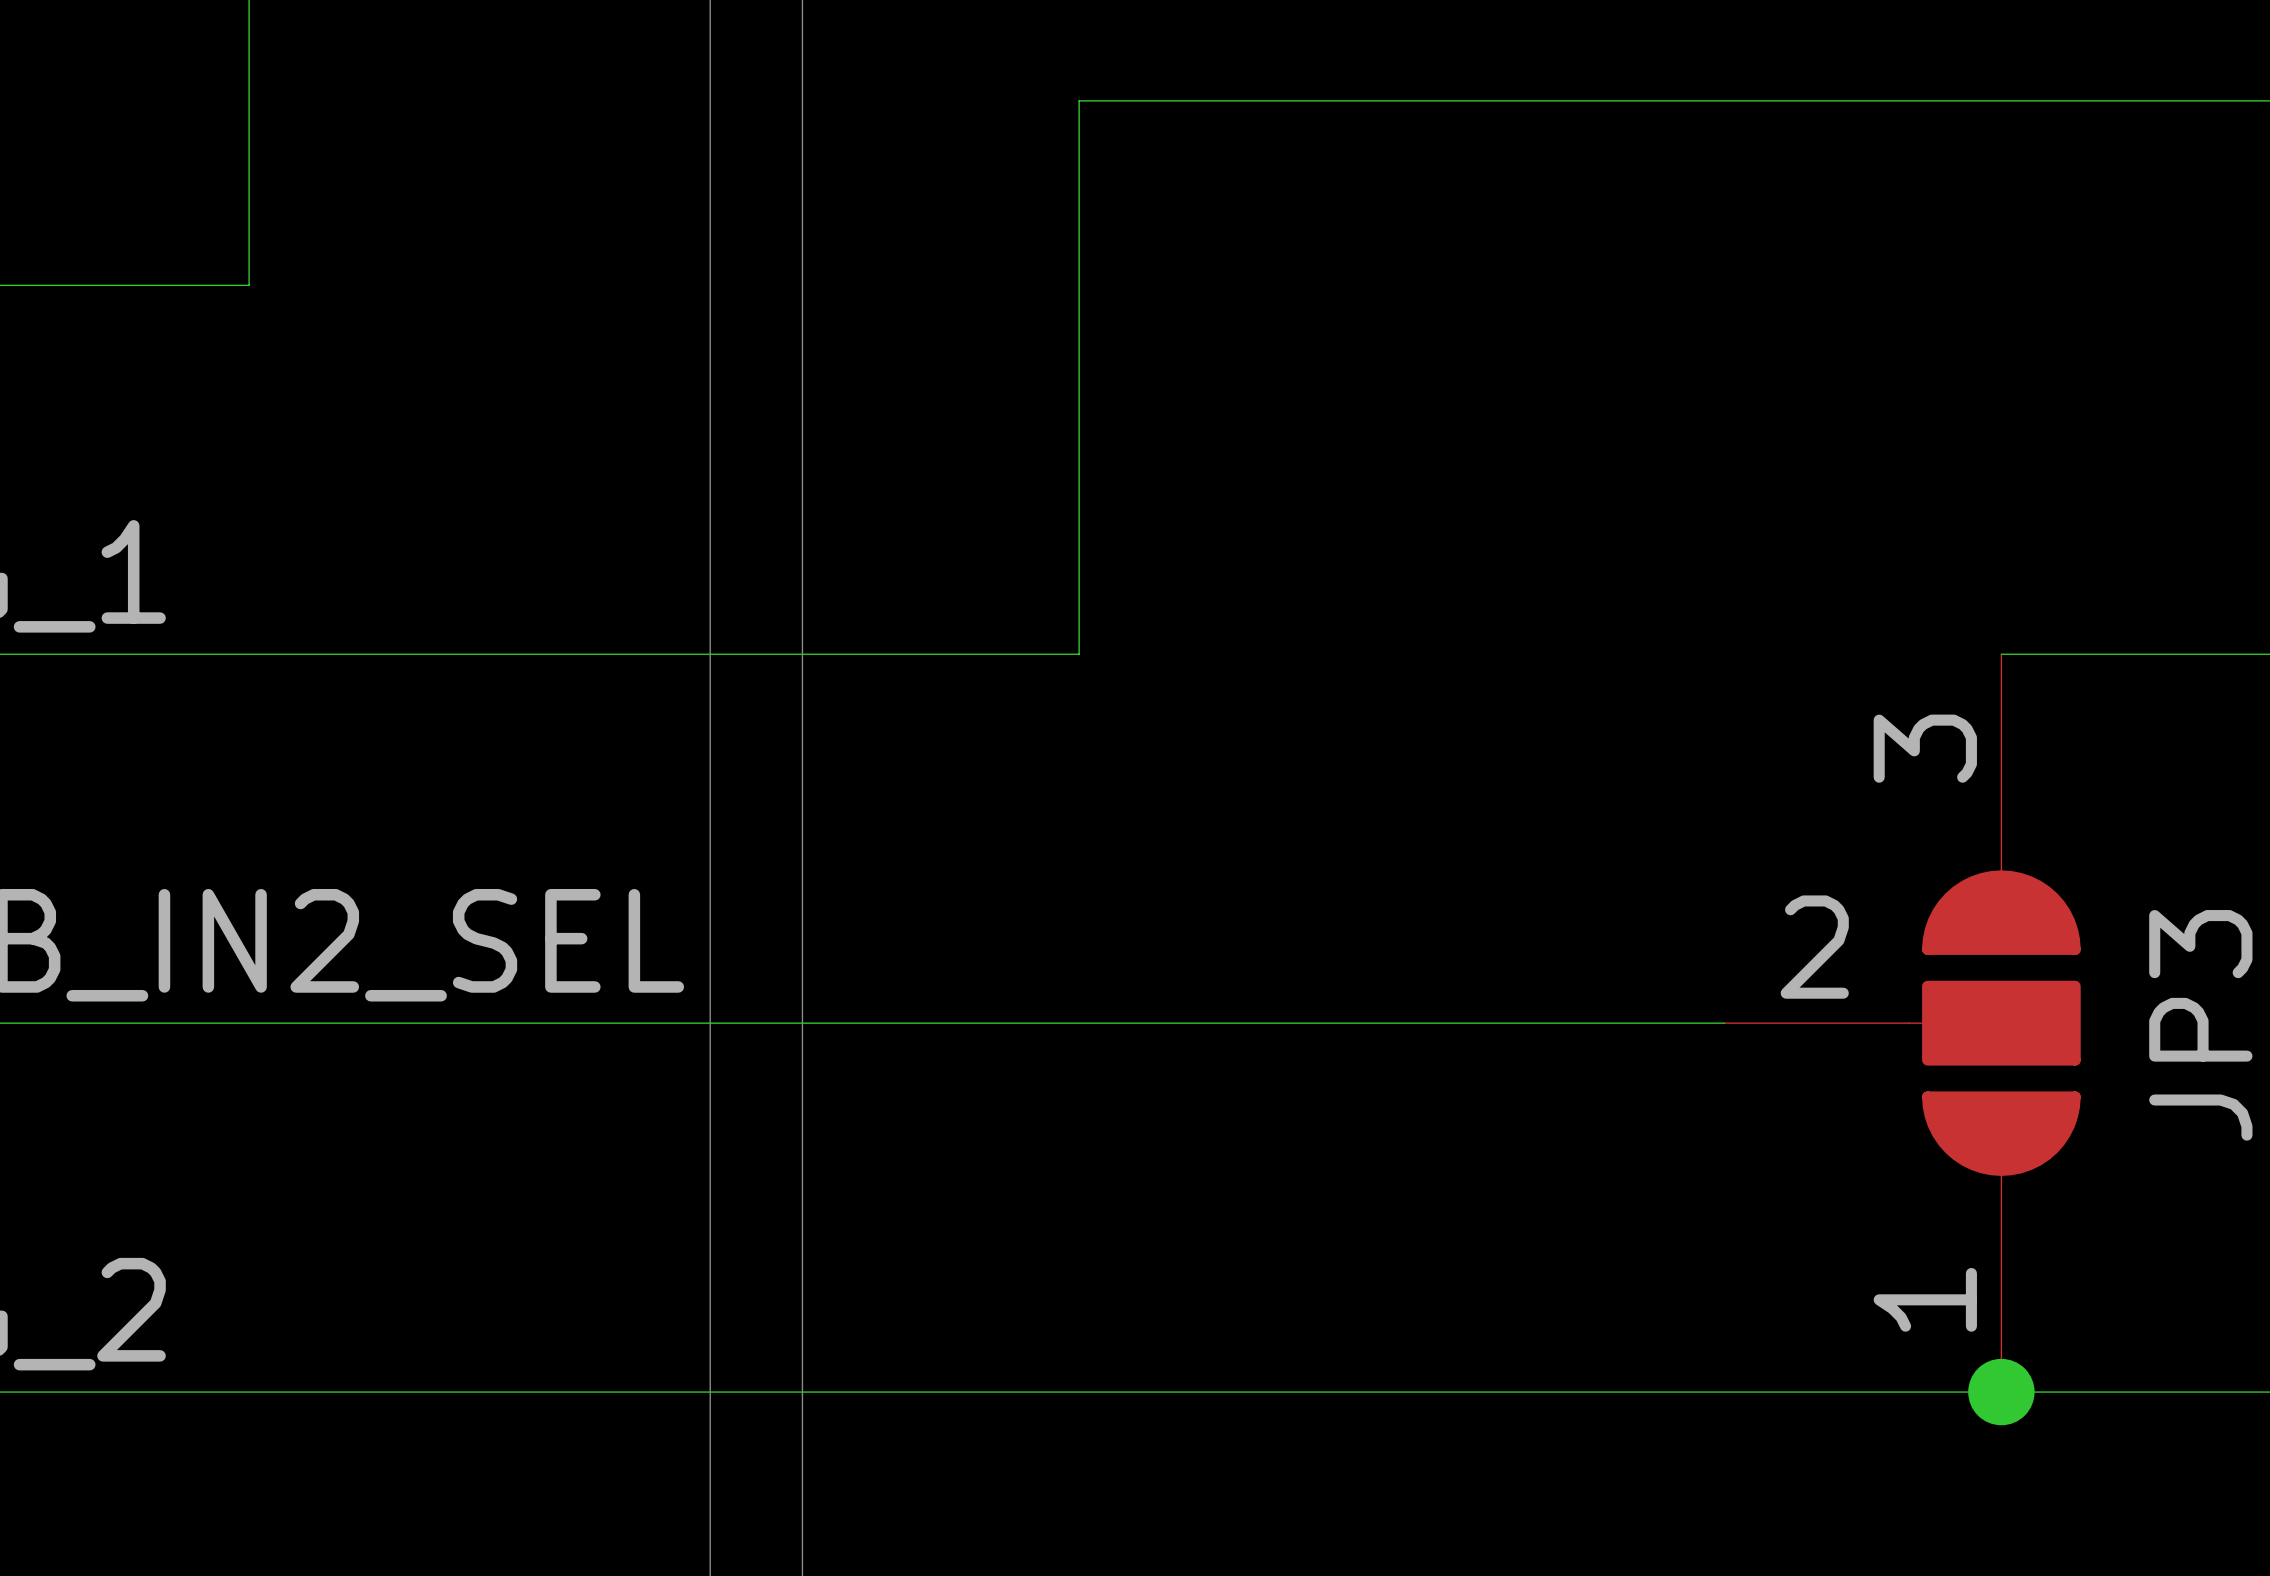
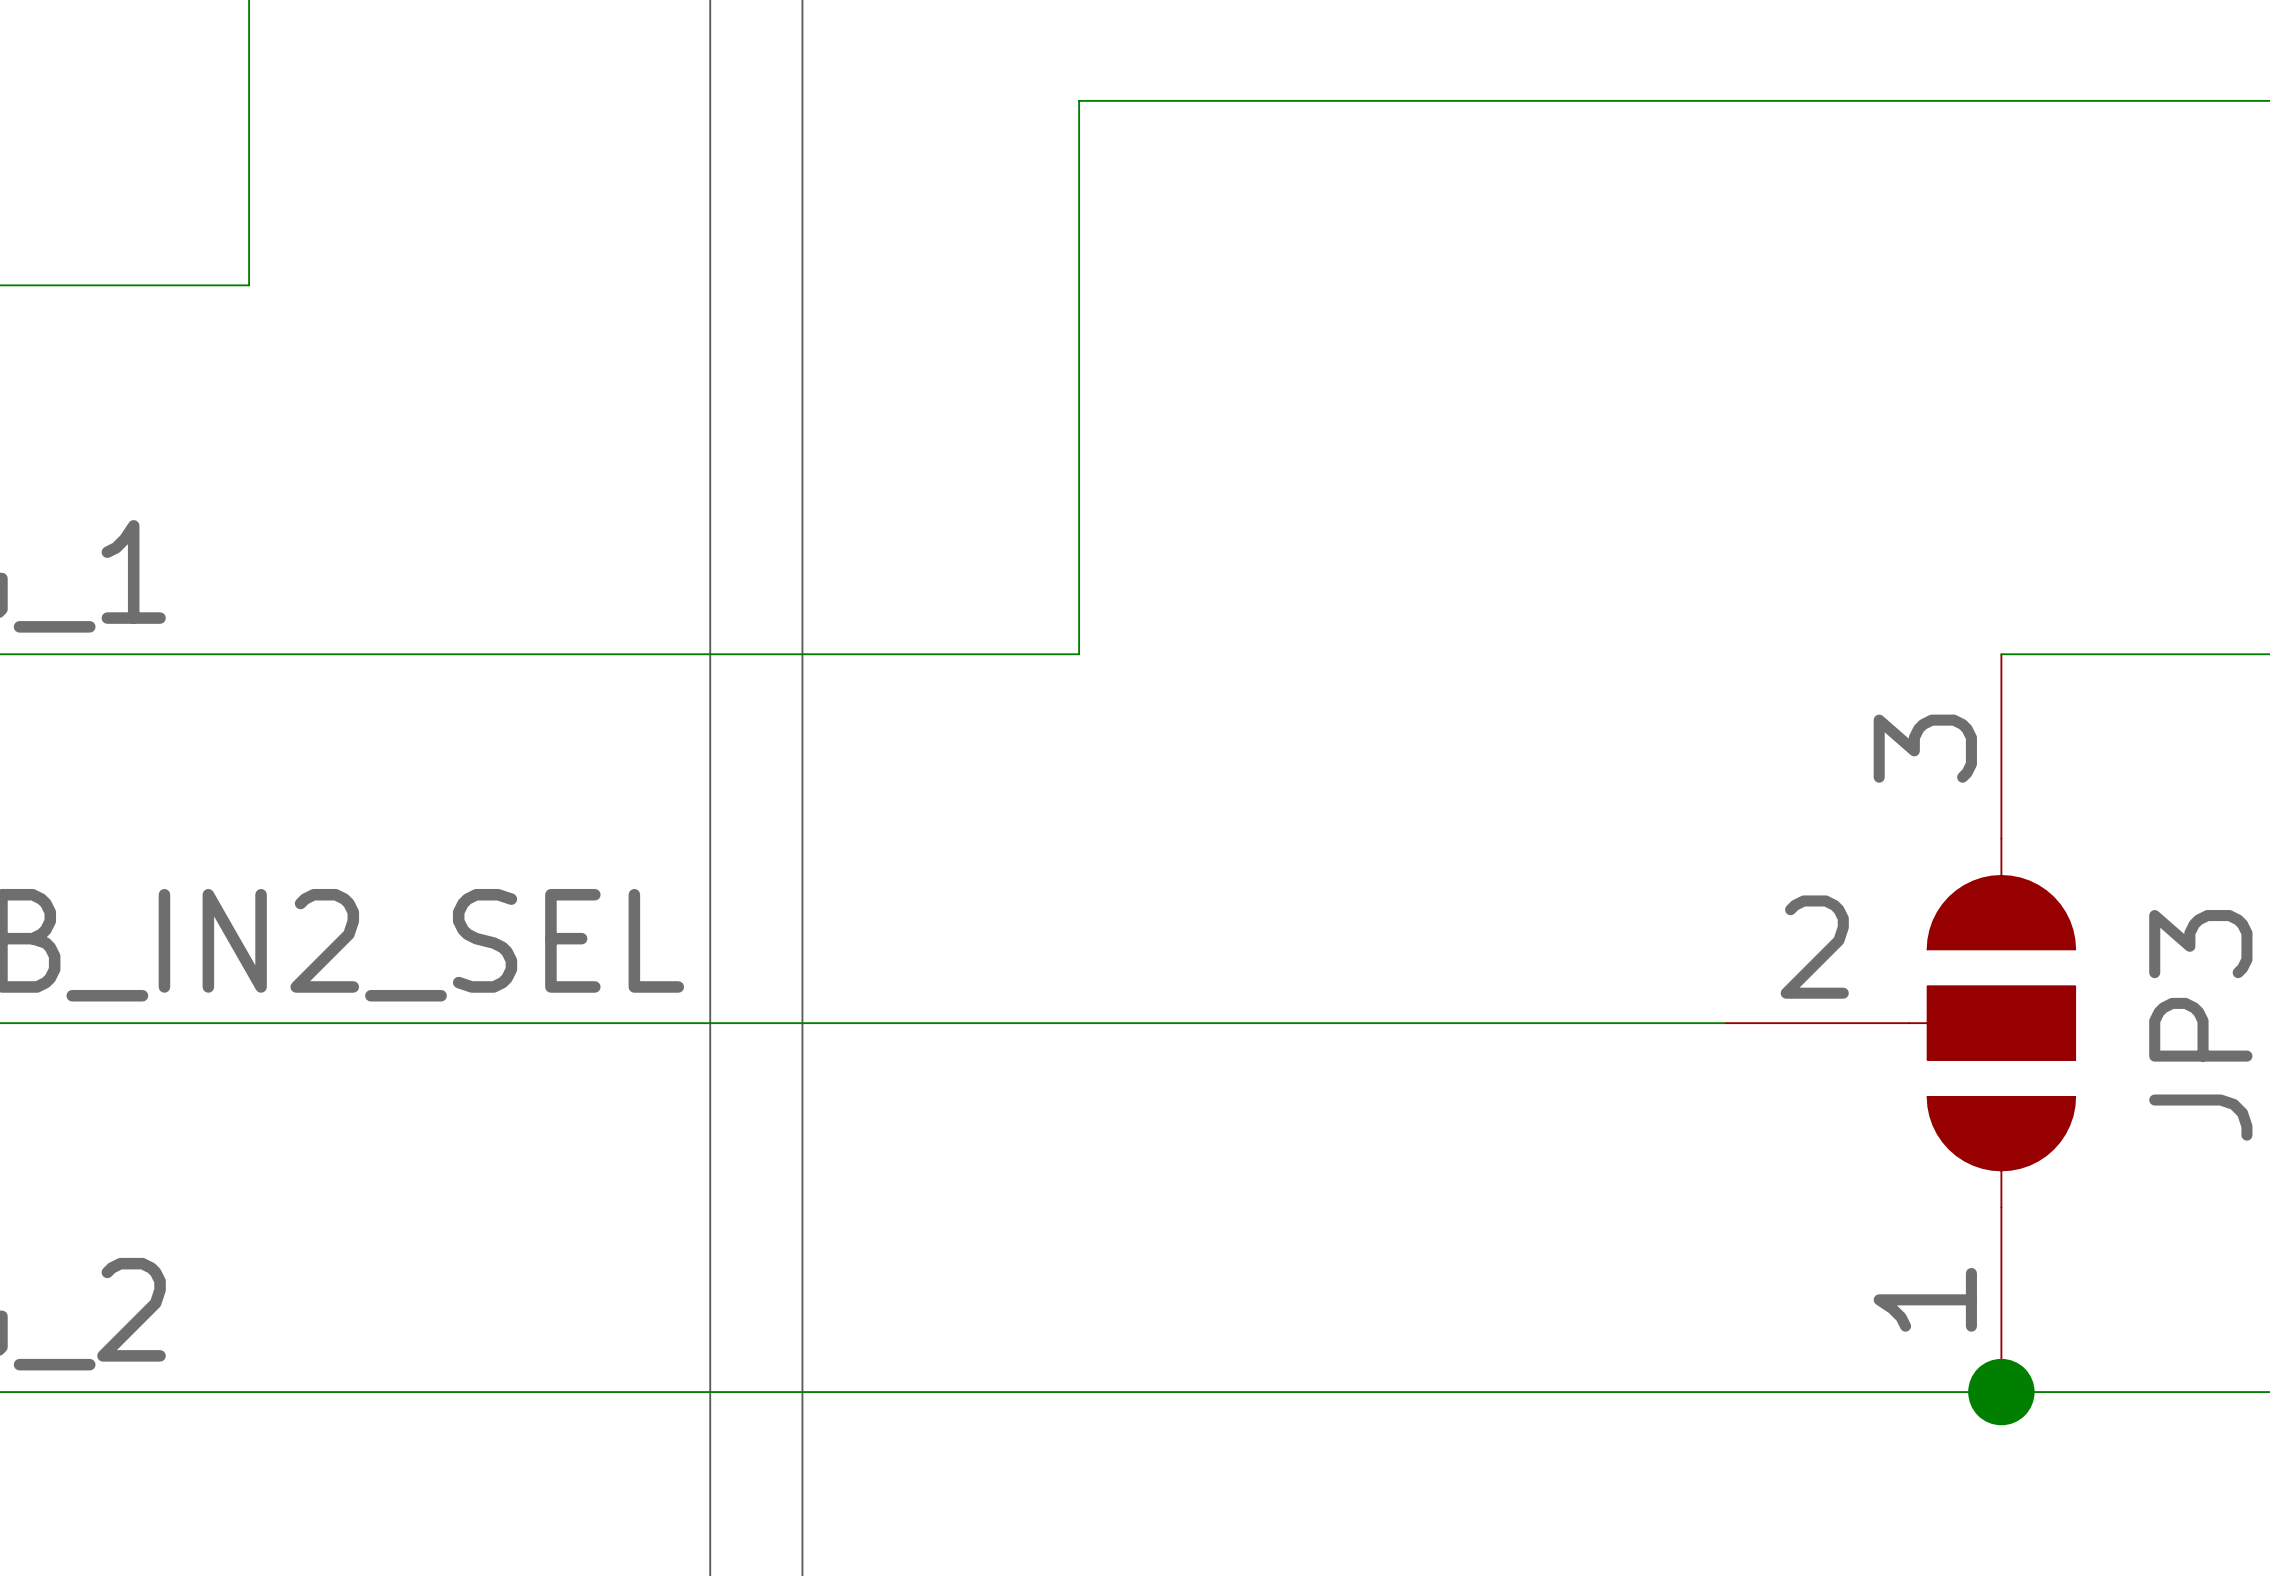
JP3 symbol: [1724, 654, 2081, 1393] -> [1724, 654, 2076, 1393]

